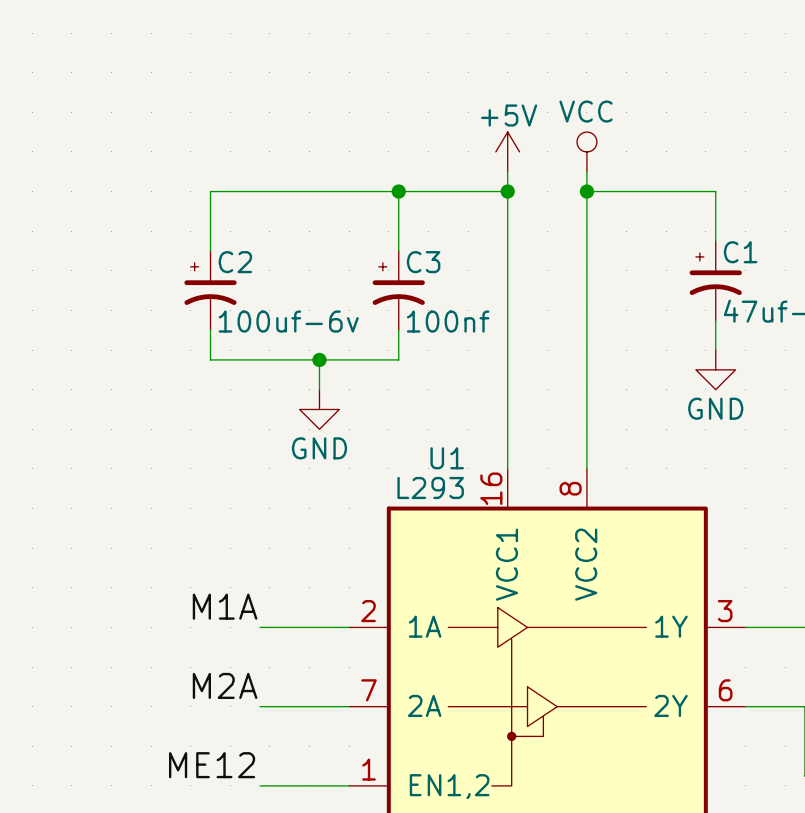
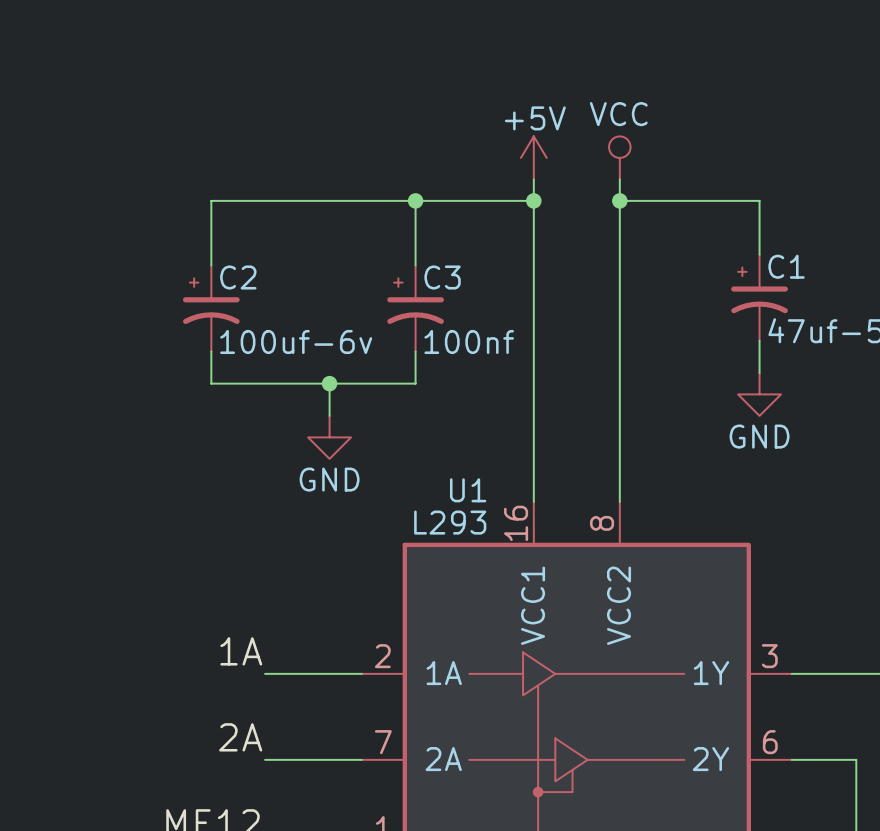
label: M1A (225, 606) -> 1A (241, 651)
label: M2A (225, 685) -> 2A (240, 737)

